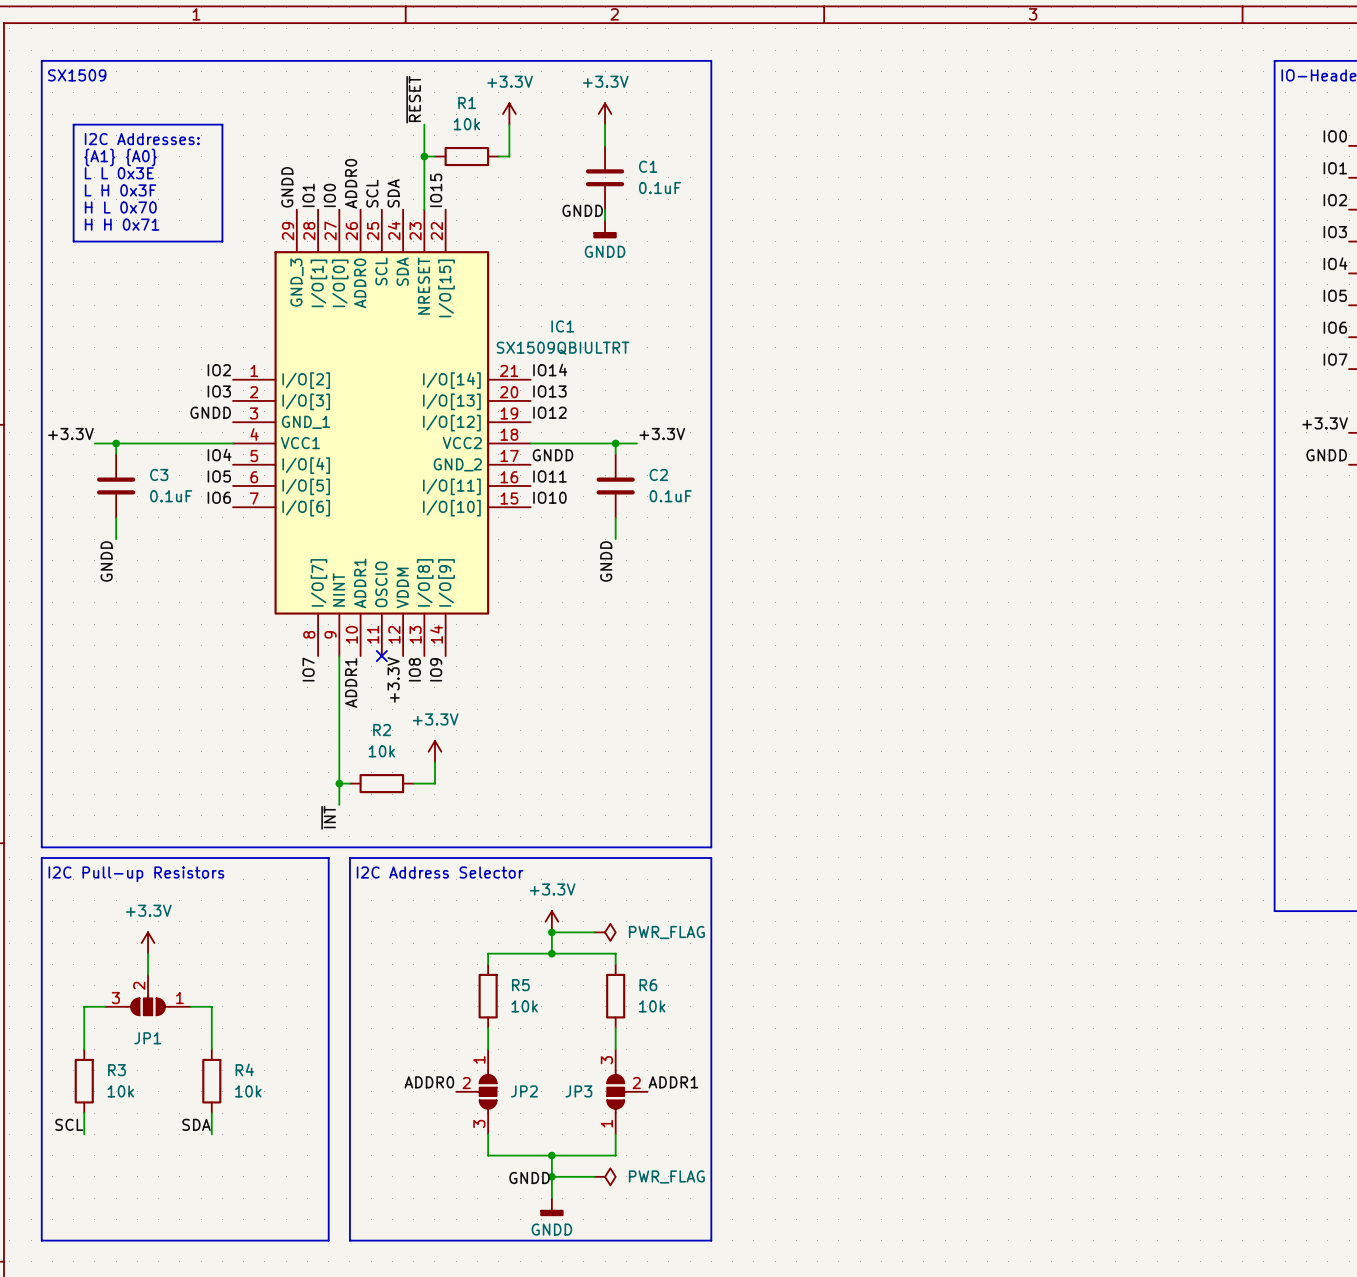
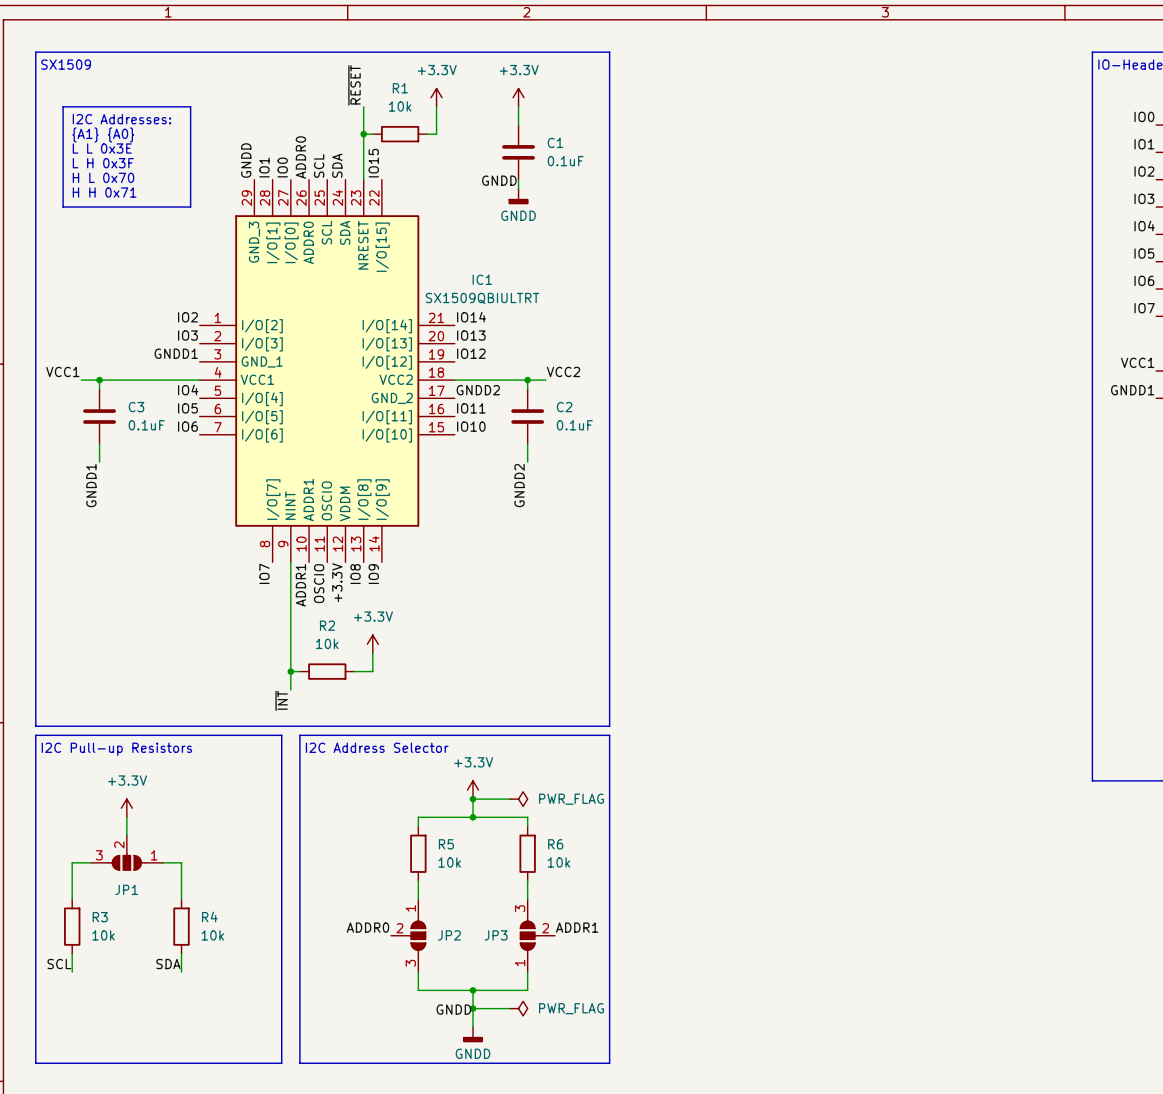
label: GNDD (210, 412) -> GNDD1 (176, 353)
label: +3.3V (1325, 423) -> VCC1 (1137, 362)
label: +3.3V (71, 434) -> VCC1 (62, 371)
label: +3.3V (662, 434) -> VCC2 (563, 371)
label: GNDD (552, 455) -> GNDD2 (478, 390)
label: GNDD (1326, 455) -> GNDD1 (1132, 390)
label: GNDD (106, 561) -> GNDD1 (91, 485)
label: GNDD (606, 561) -> GNDD2 (519, 485)
no-connect mark: (381, 656) -> none
label: none -> OSCIO (319, 583)

